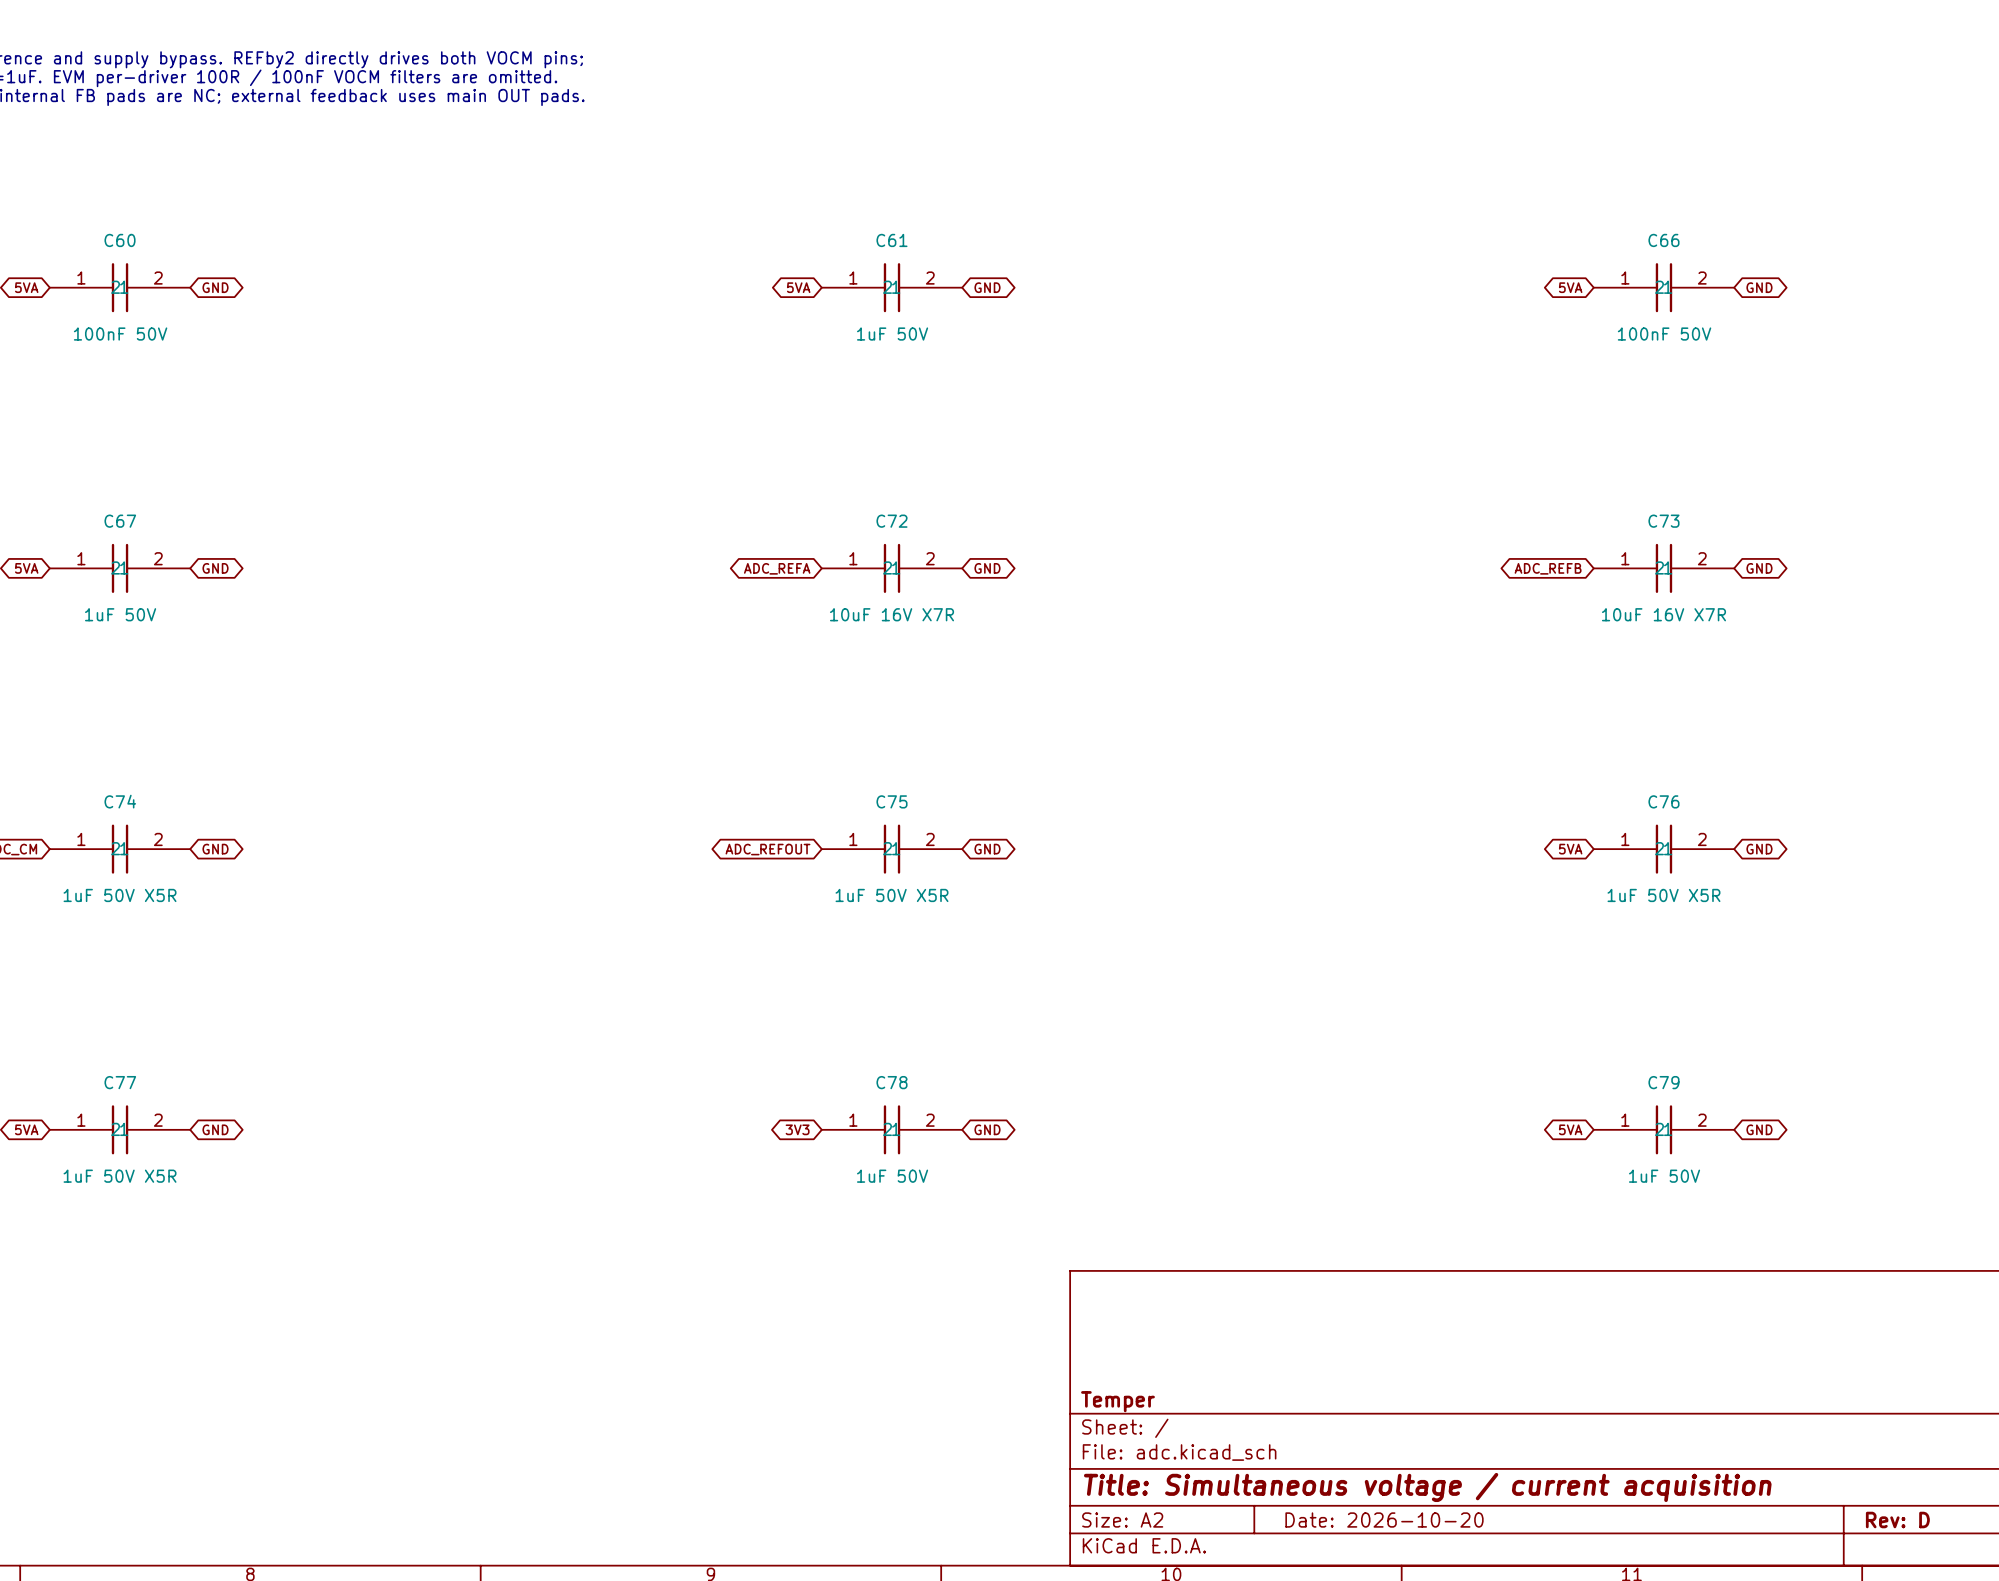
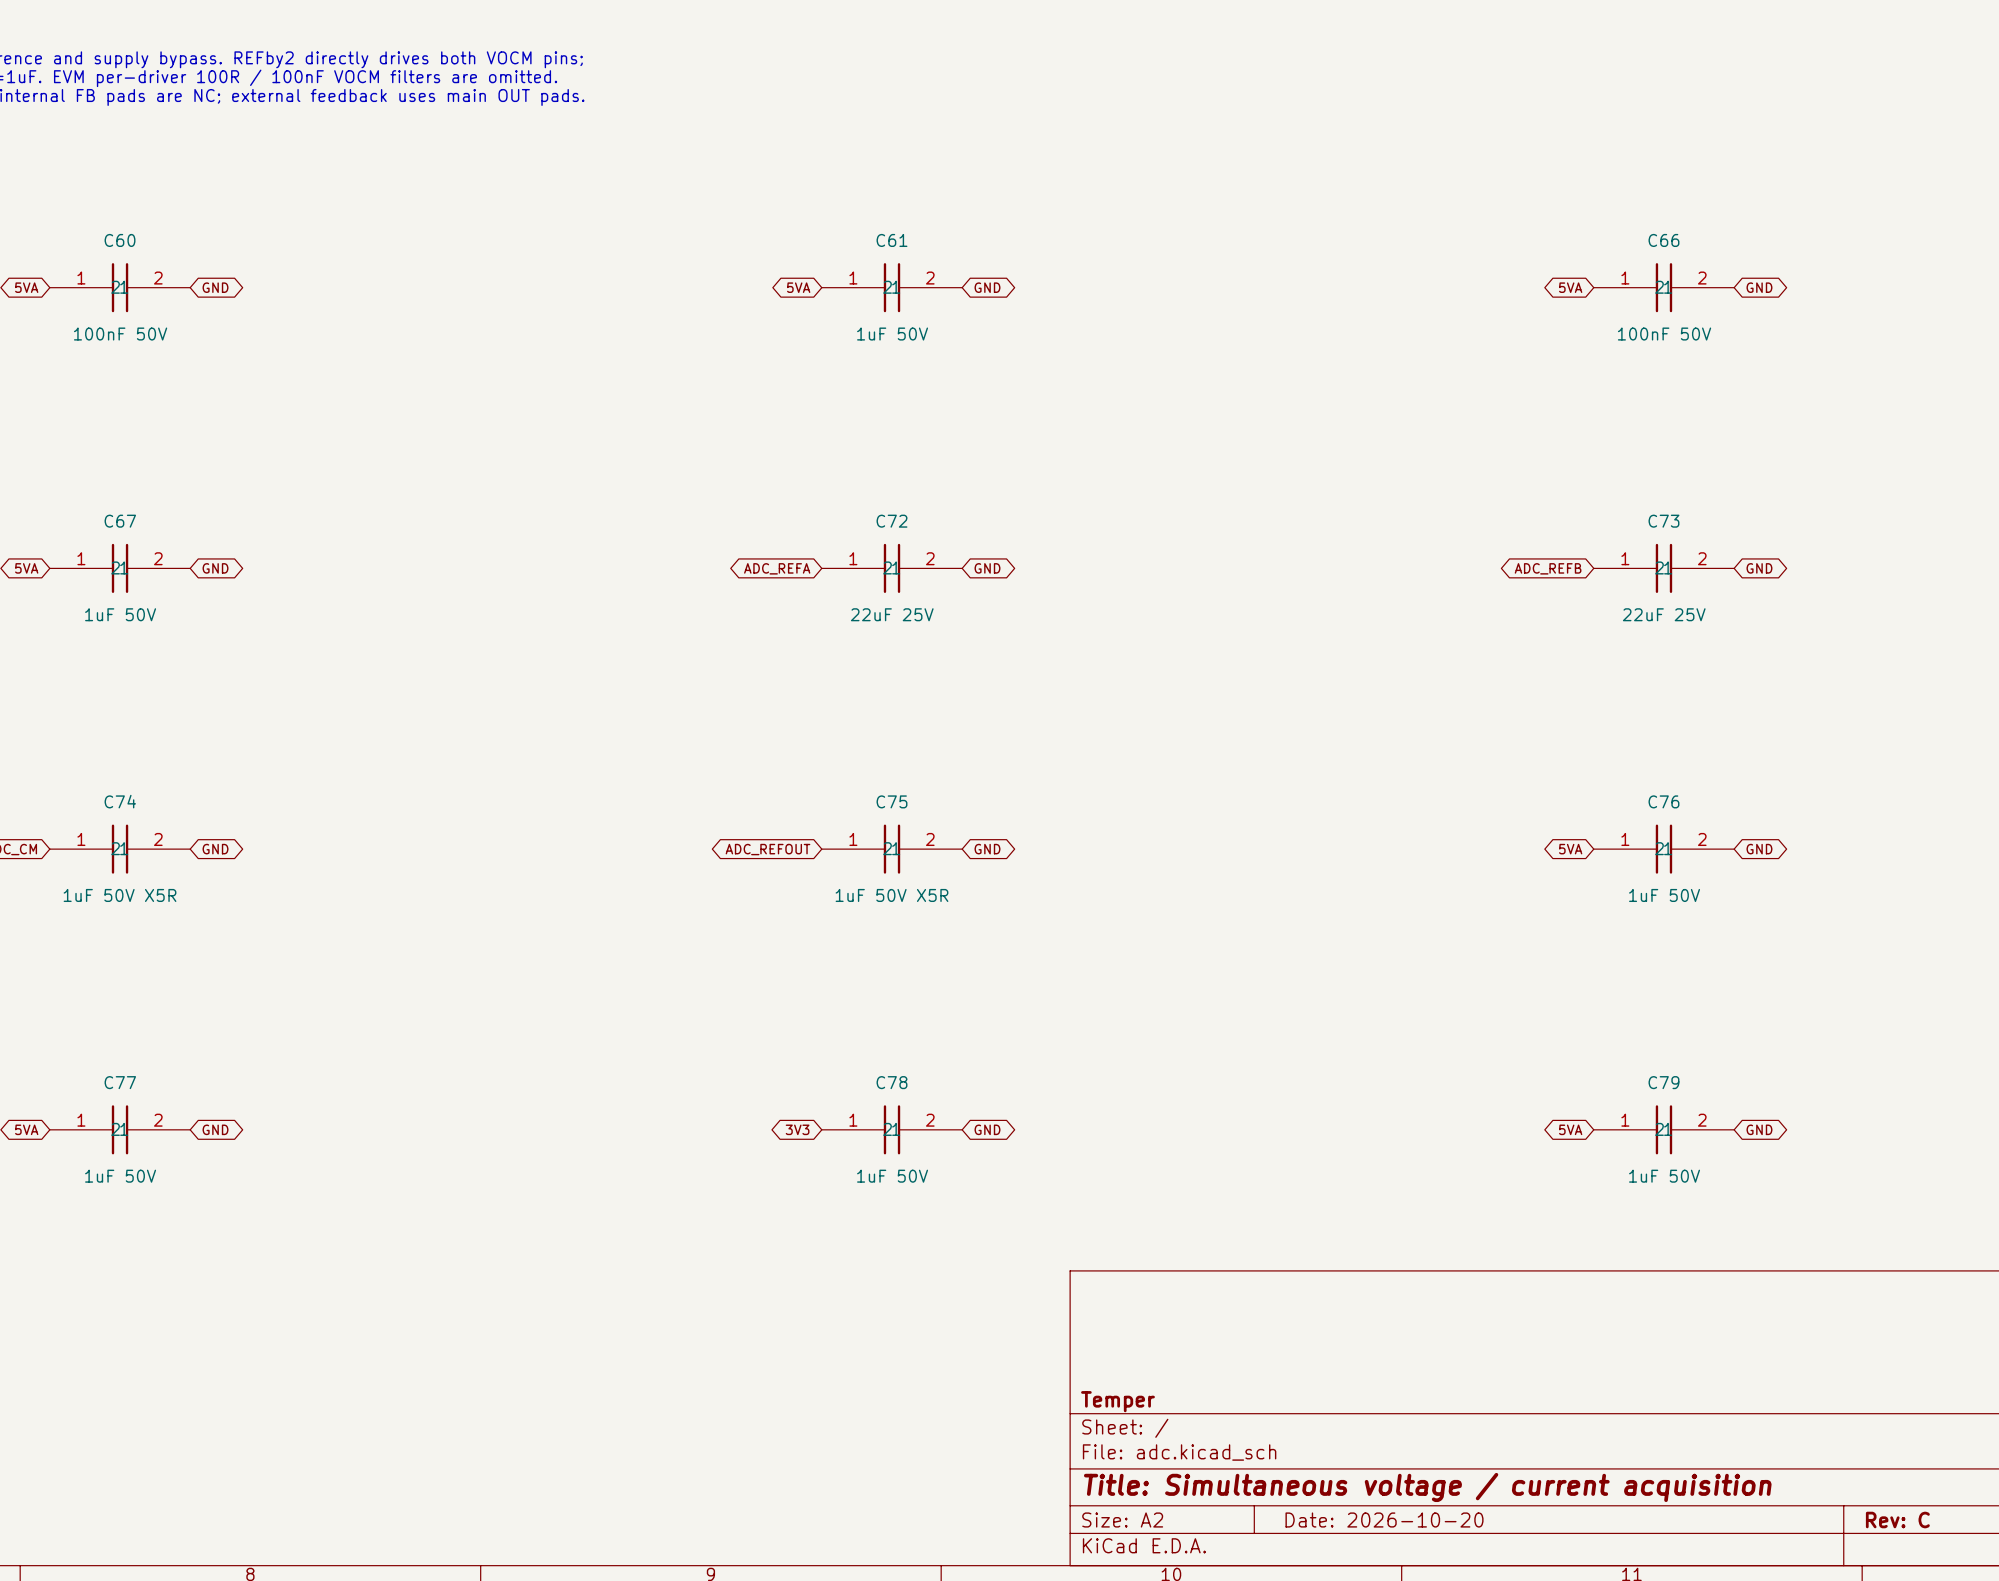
C72 value: 10uF 16V X7R (891, 614) -> 22uF 25V (892, 614)
C73 value: 10uF 16V X7R (1663, 614) -> 22uF 25V (1664, 614)
C76 value: 1uF 50V X5R (1663, 895) -> 1uF 50V (1664, 895)
C77 value: 1uF 50V X5R (120, 1176) -> 1uF 50V (120, 1176)
title block: Rev: D (1897, 1520) -> Rev: C (1897, 1520)

